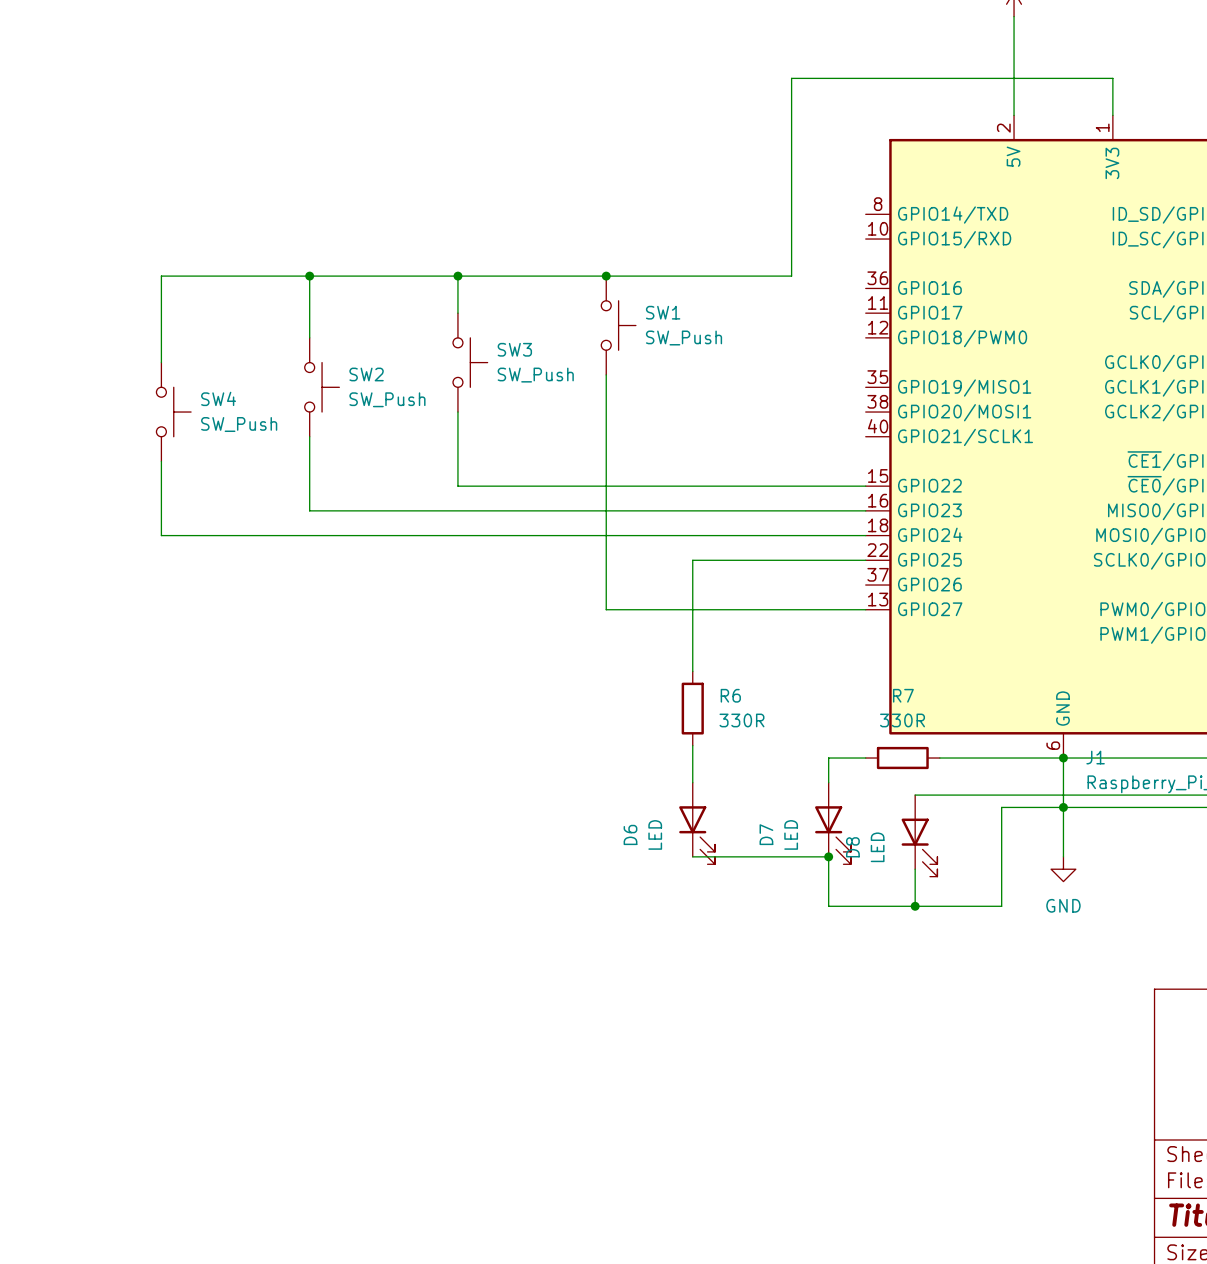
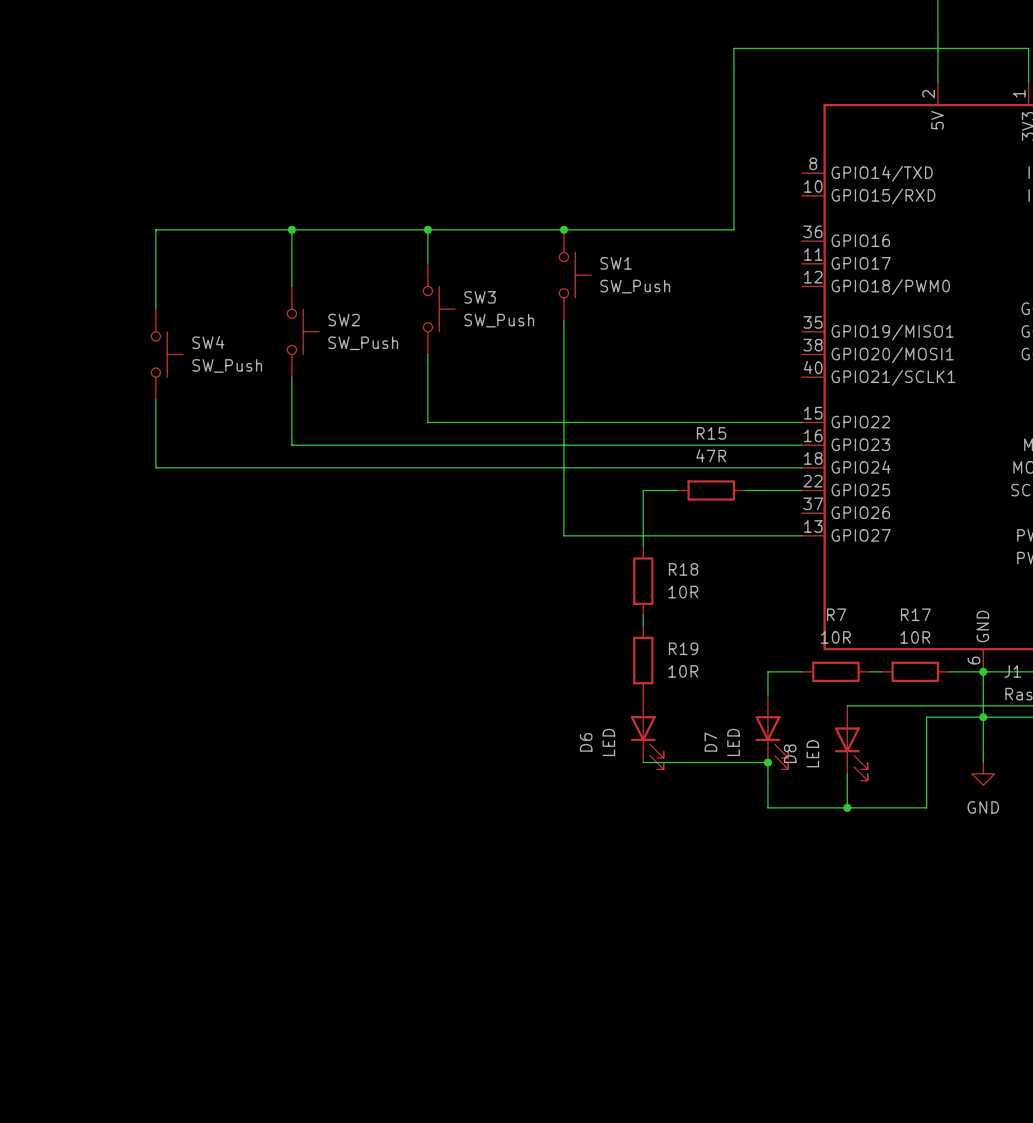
wire: (729, 560) (803, 560) -> none
R15: none -> 47R (711, 490)
wire: (692, 622) (692, 671) -> none
R18: none -> 10R (643, 581)
wire: none -> (643, 615) (643, 626)
R6: 330R (692, 708) -> none
R7 value: 330R (902, 720) -> 10R (835, 637)
wire: (692, 745) (692, 782) -> none
R19: none -> 10R (643, 660)
wire: (952, 758) (1026, 758) -> none
R17: none -> 10R (915, 671)

